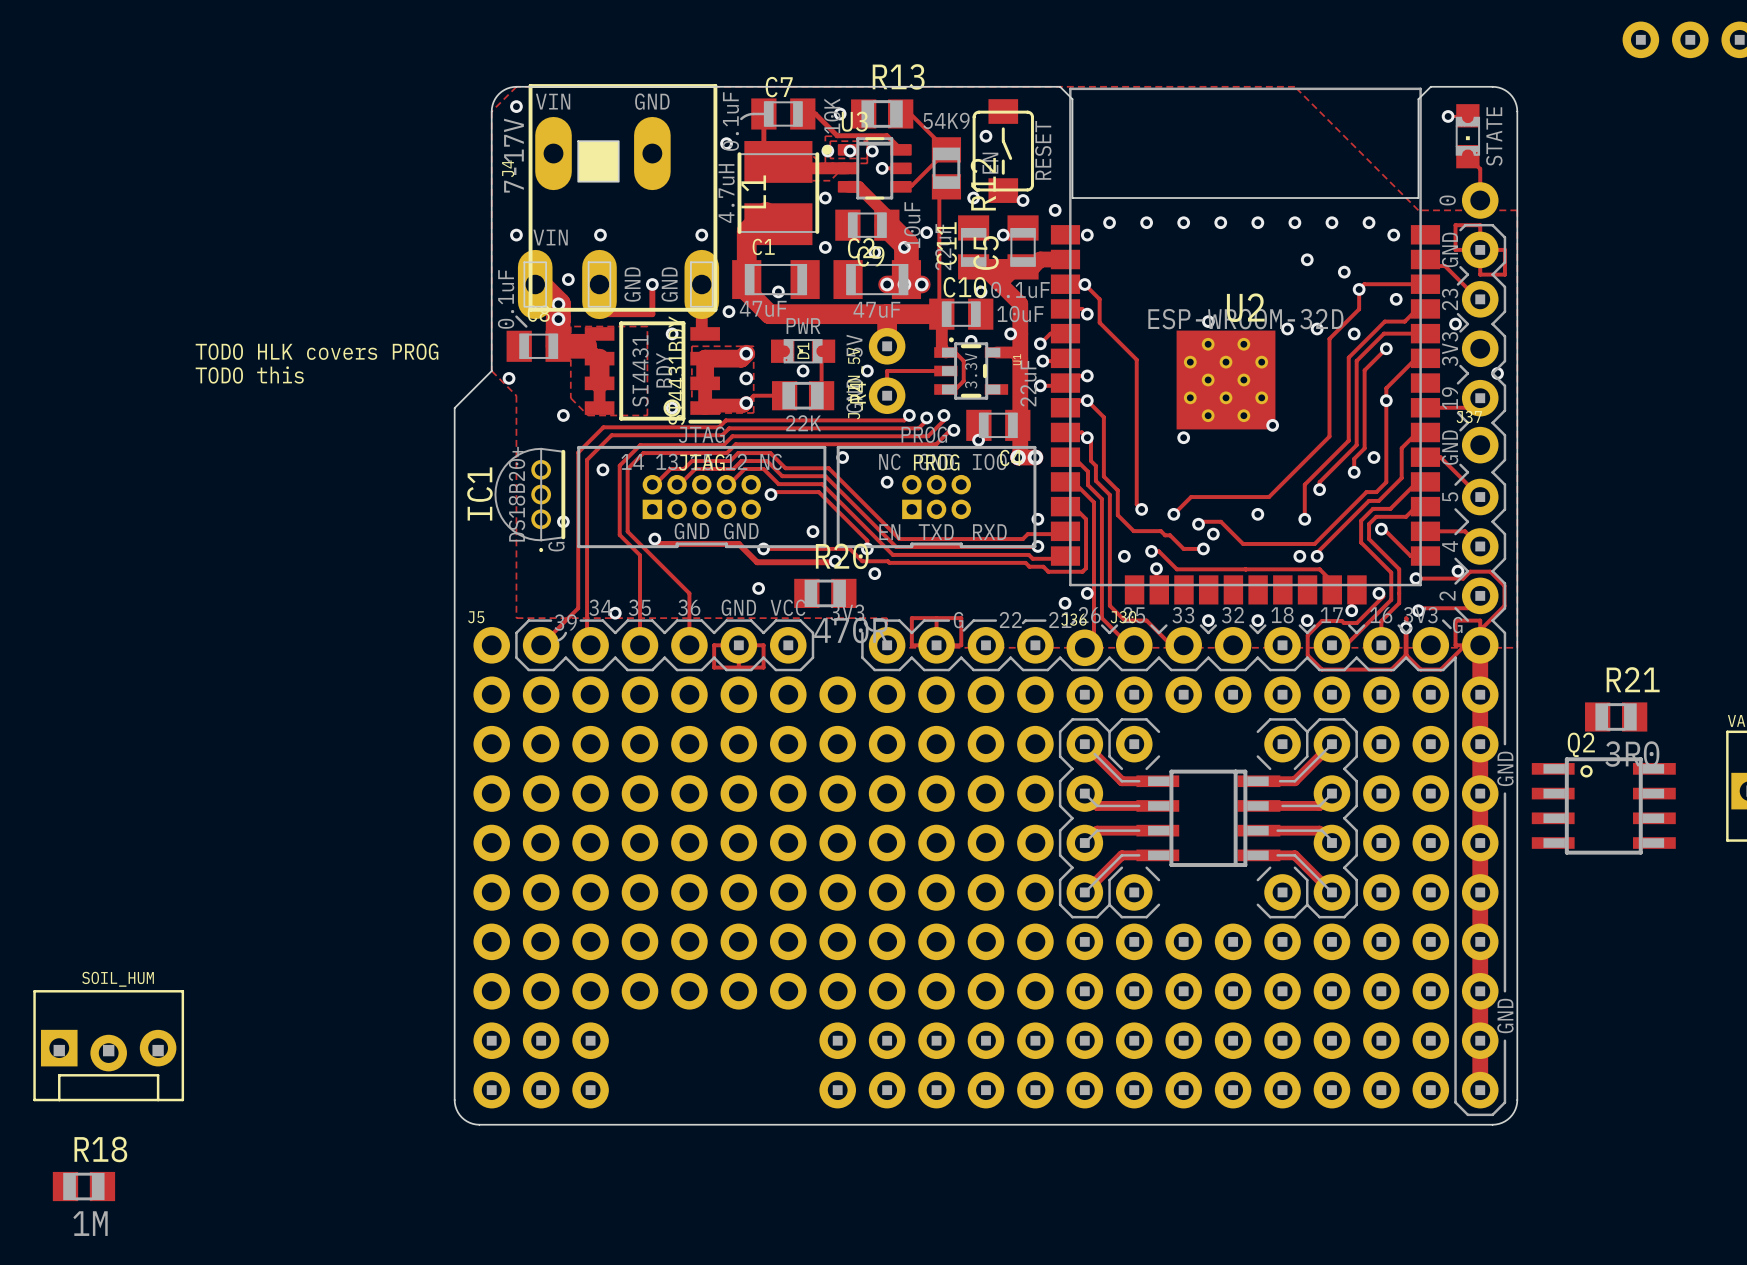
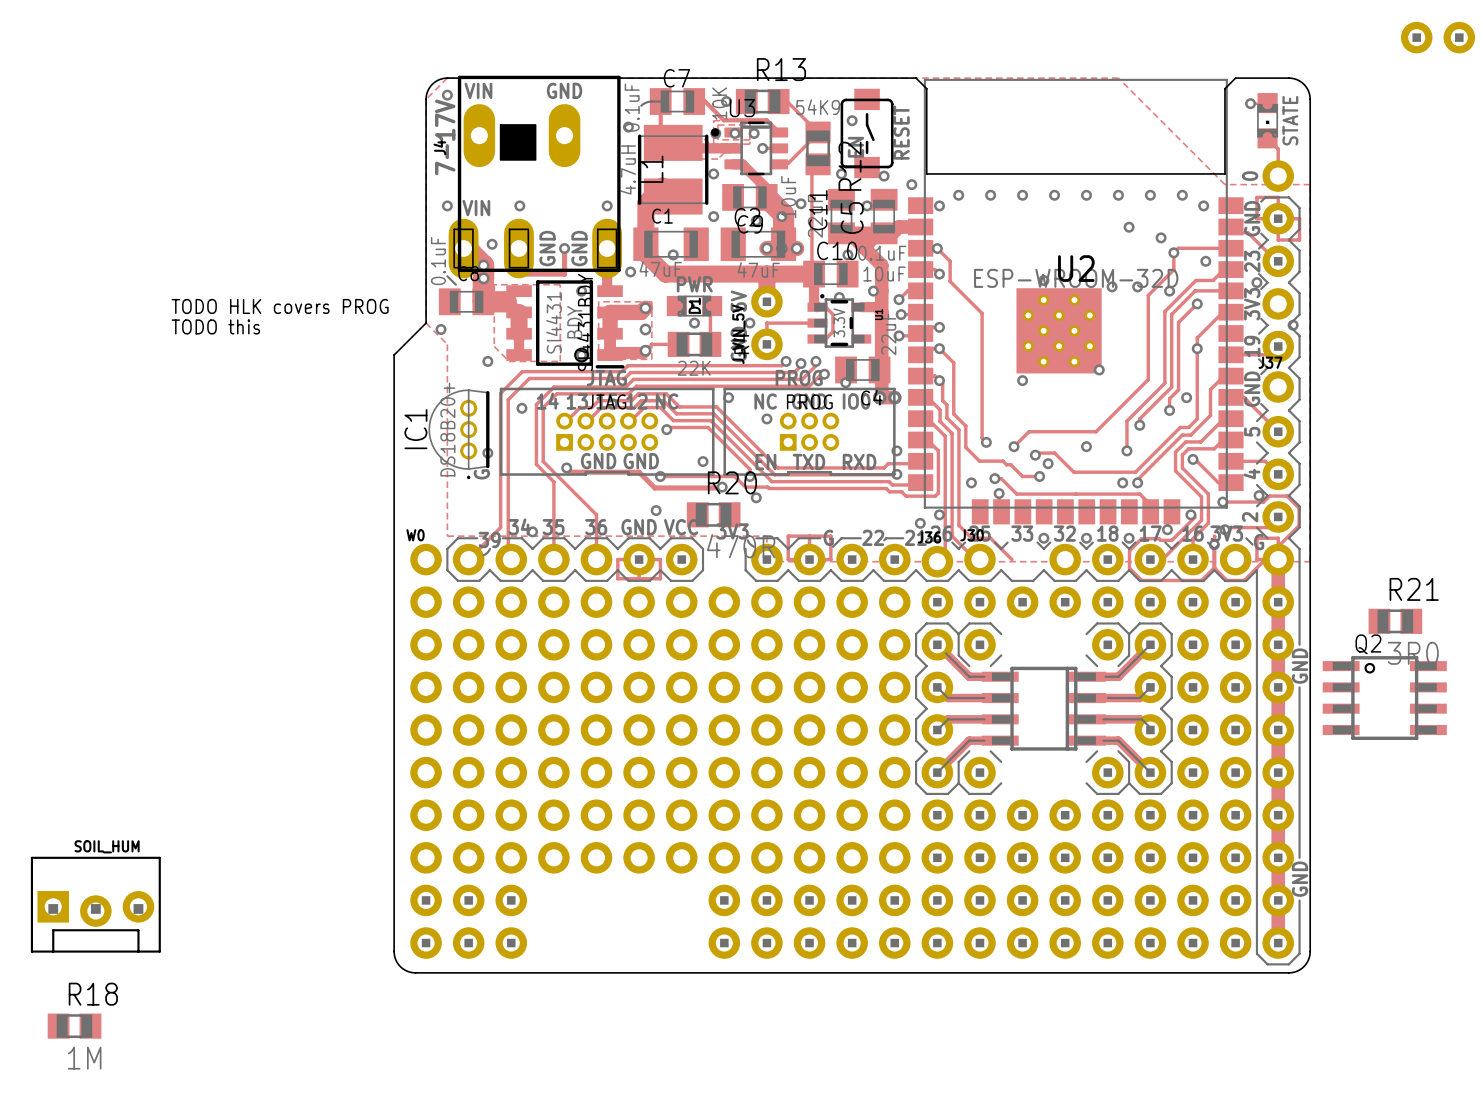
J5 name: J5 (476, 617) -> W0 (415, 535)
part: (1183, 645) -> none

